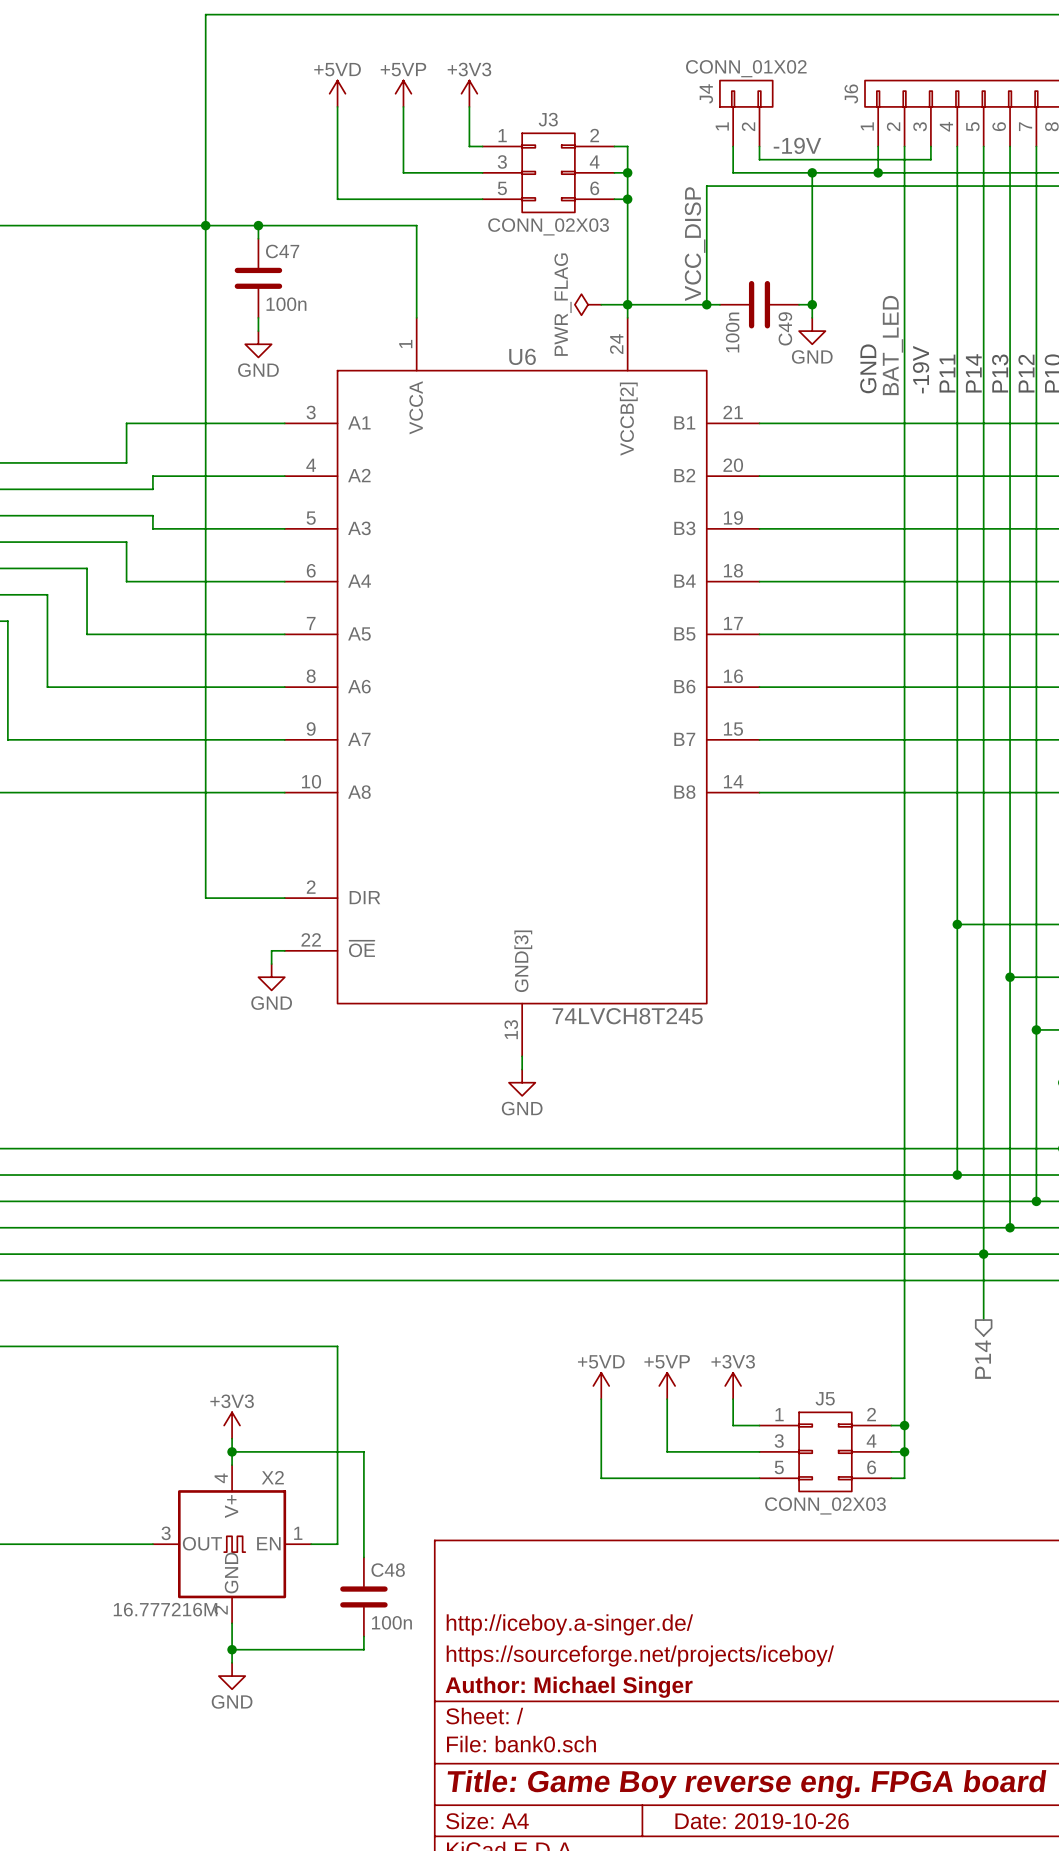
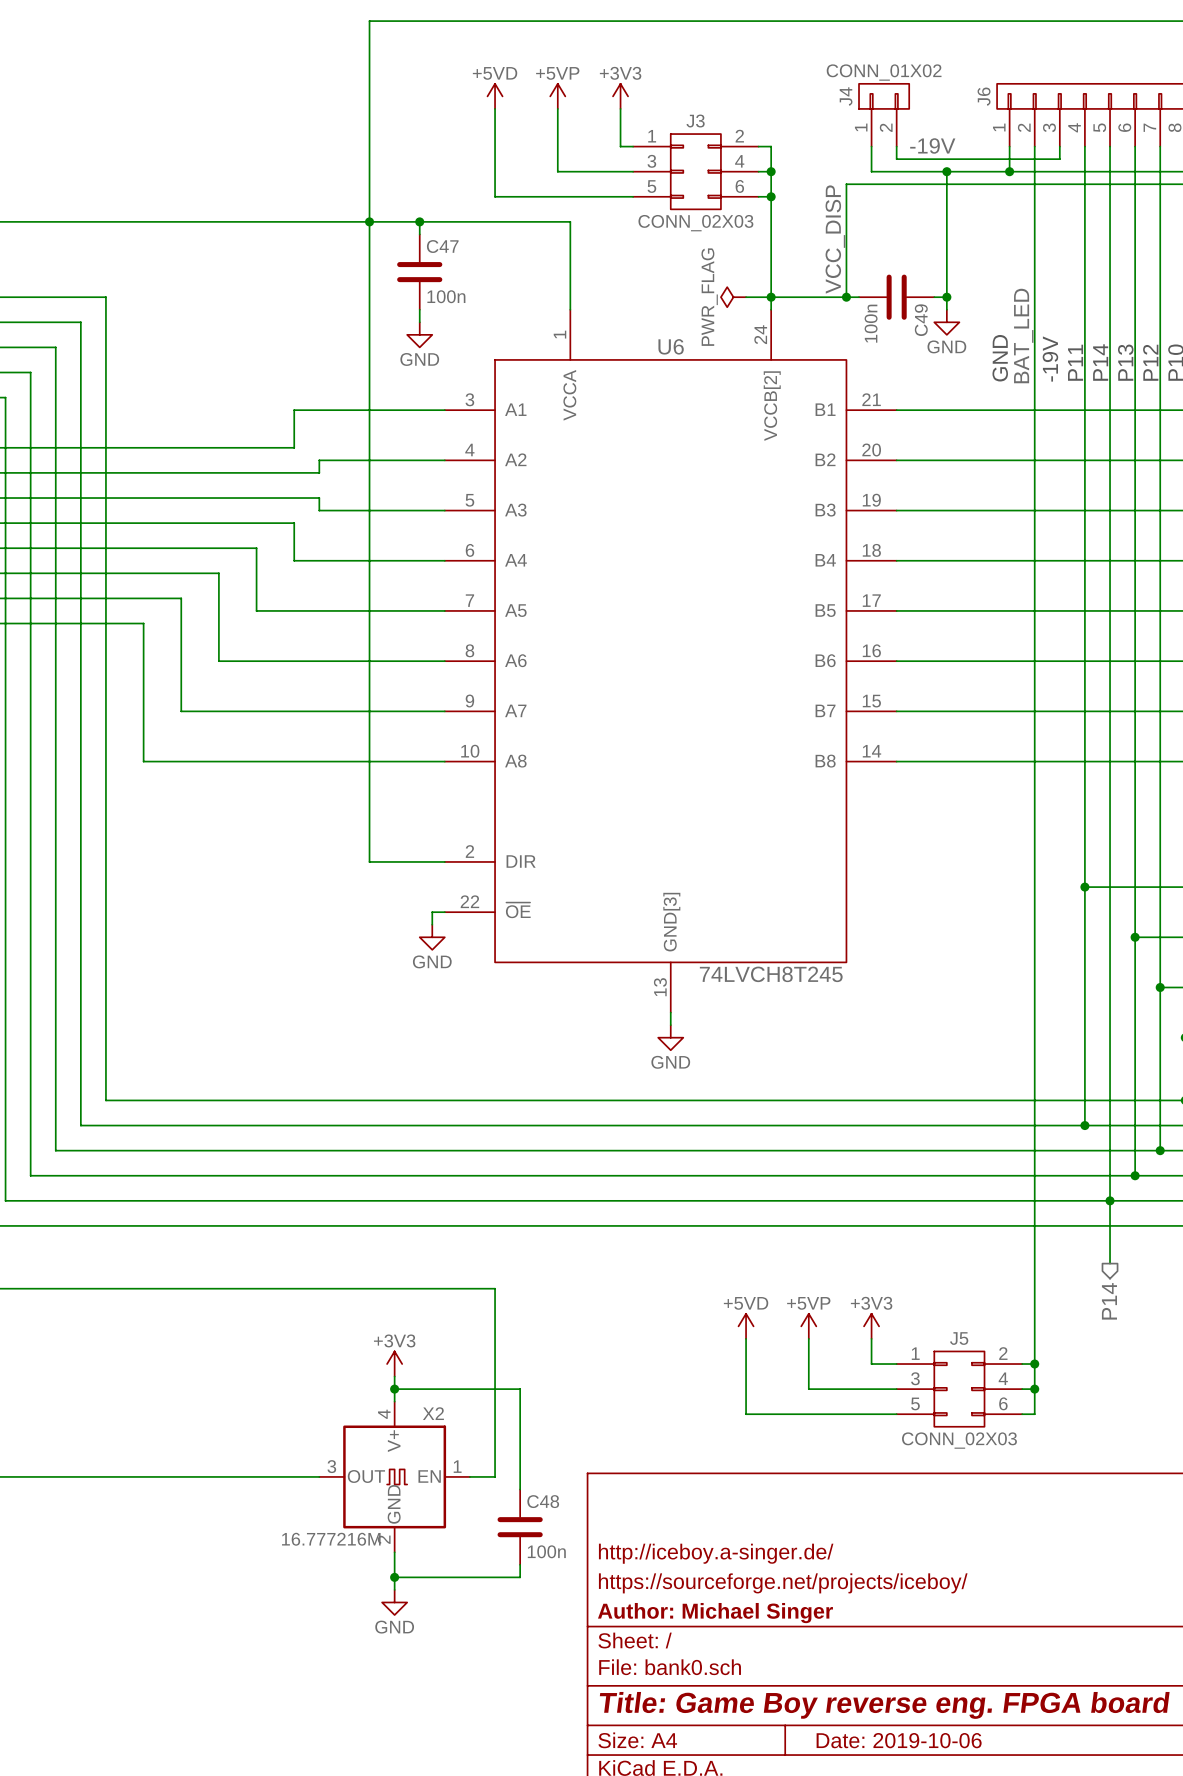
title block: Date: 2019-10-26 (762, 1821) -> Date: 2019-10-06 (899, 1740)

